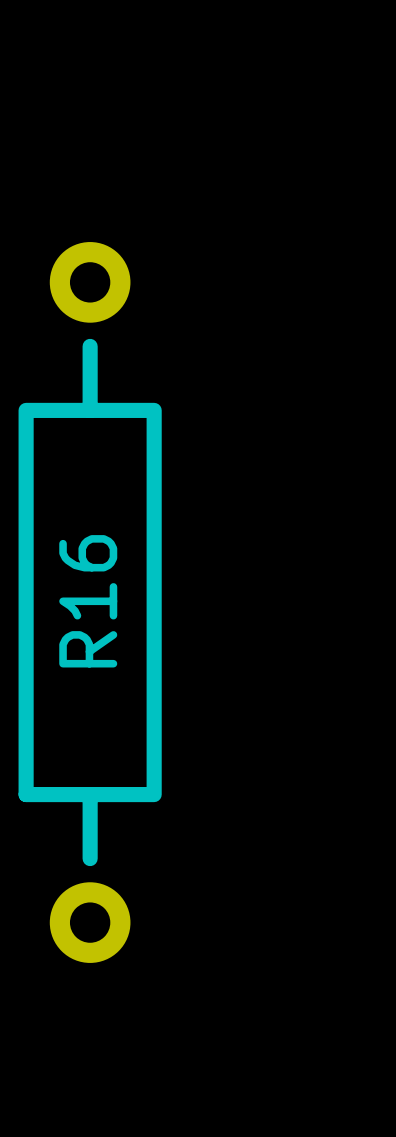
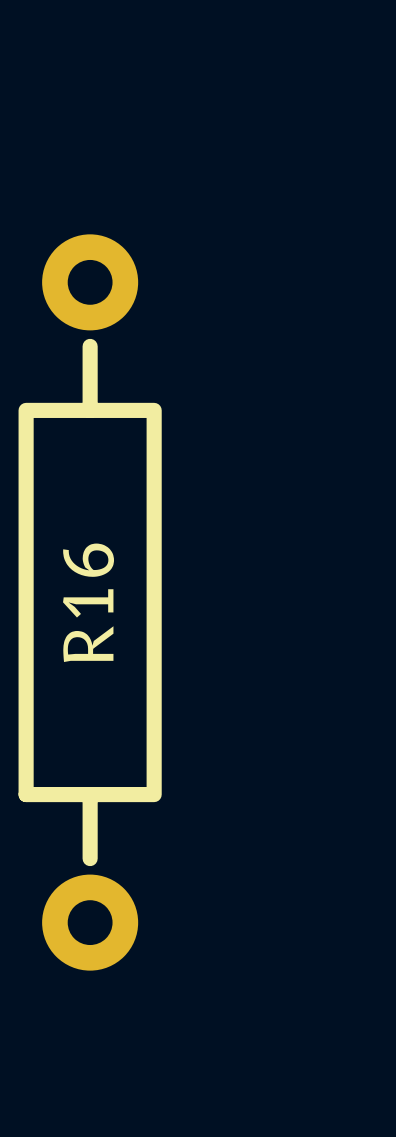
R16 footprint: [18, 242, 162, 963] -> [18, 234, 162, 971]

